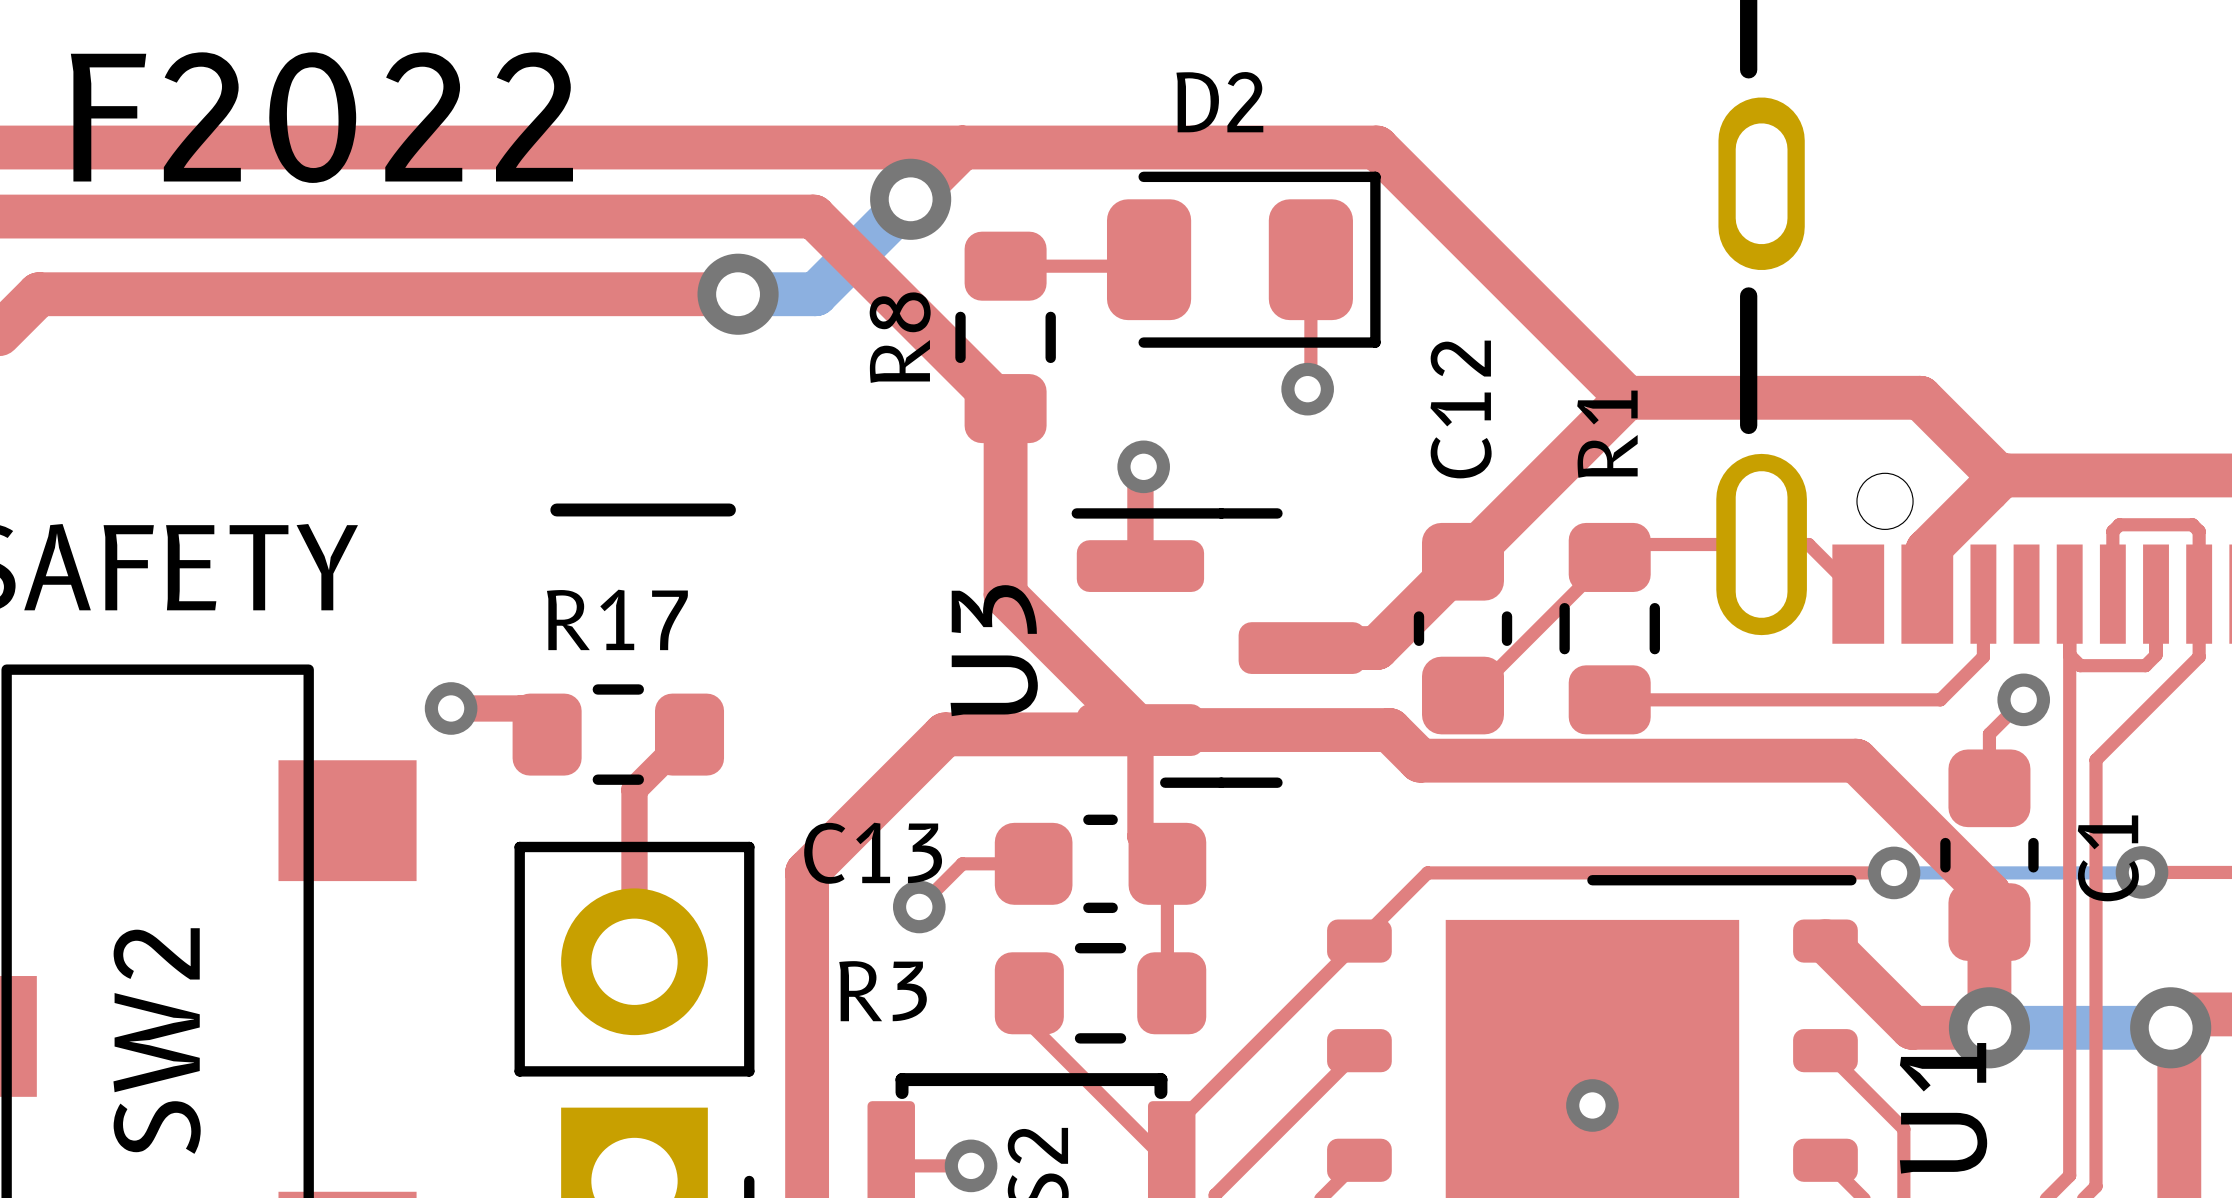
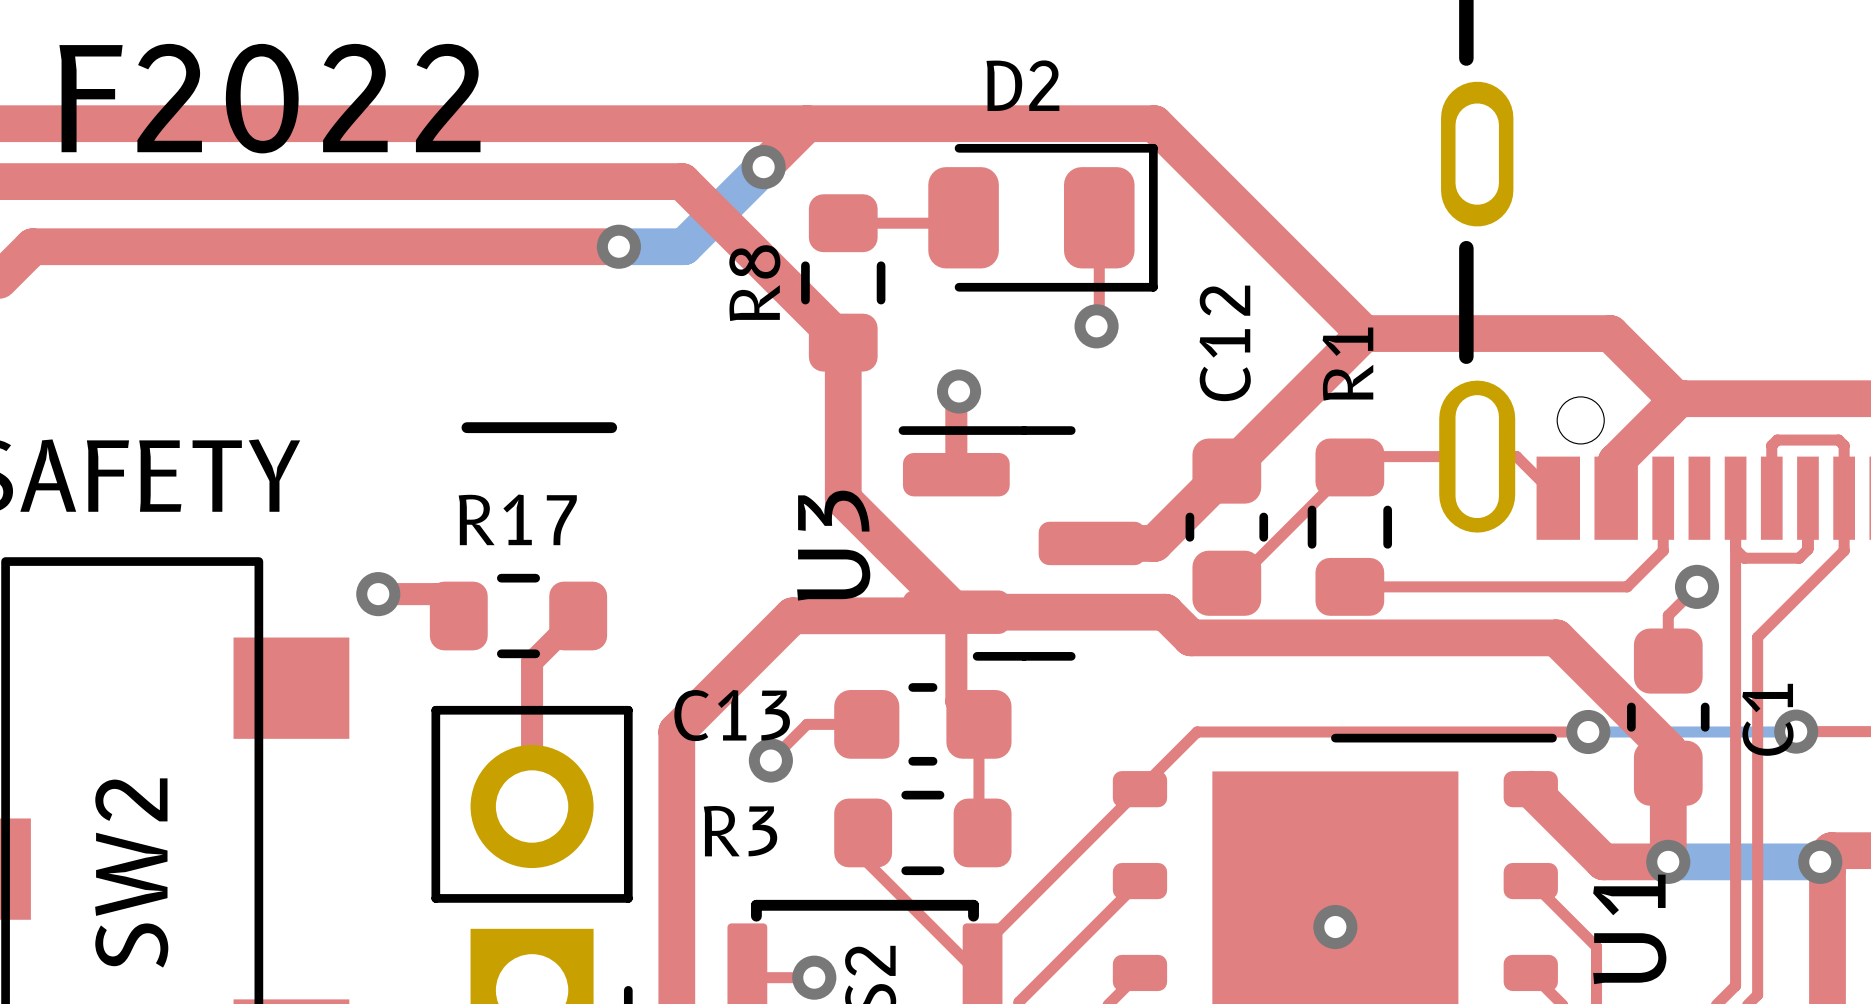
via size: [870, 158, 952, 240] -> [741, 145, 786, 190]
via size: [697, 253, 779, 335] -> [596, 224, 641, 269]
via size: [1948, 987, 2030, 1069] -> [1646, 839, 1691, 884]
via size: [2130, 987, 2212, 1069] -> [1798, 839, 1843, 884]

